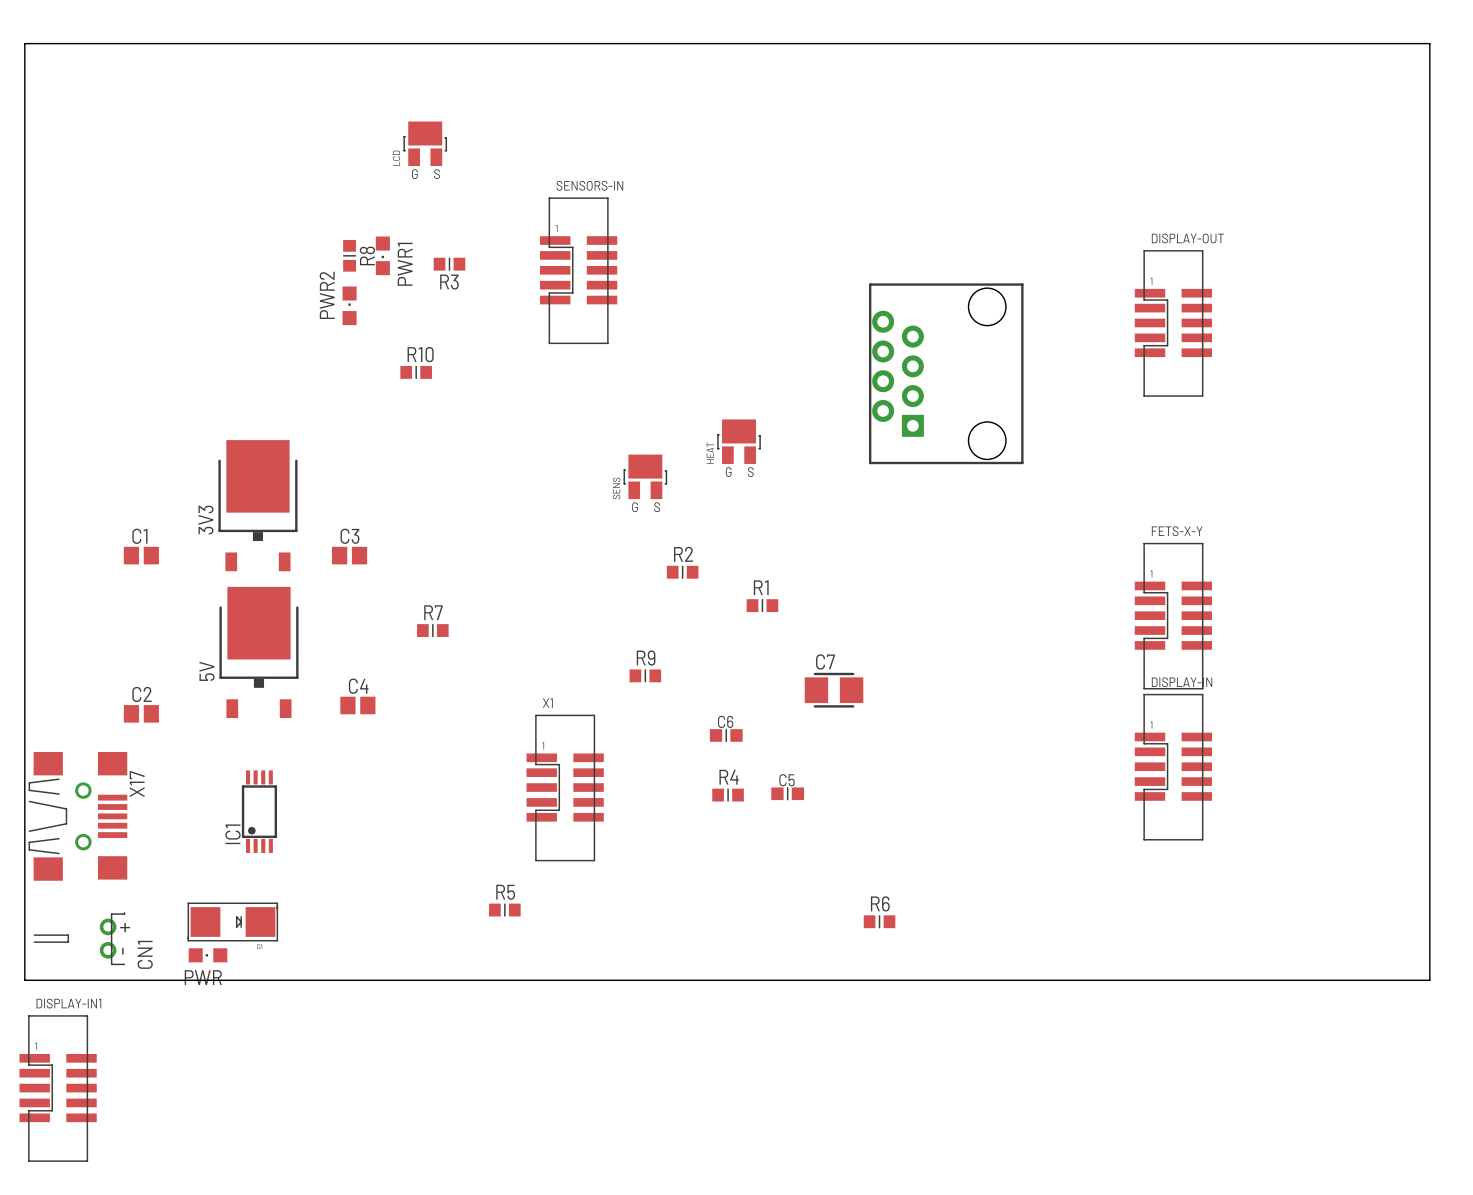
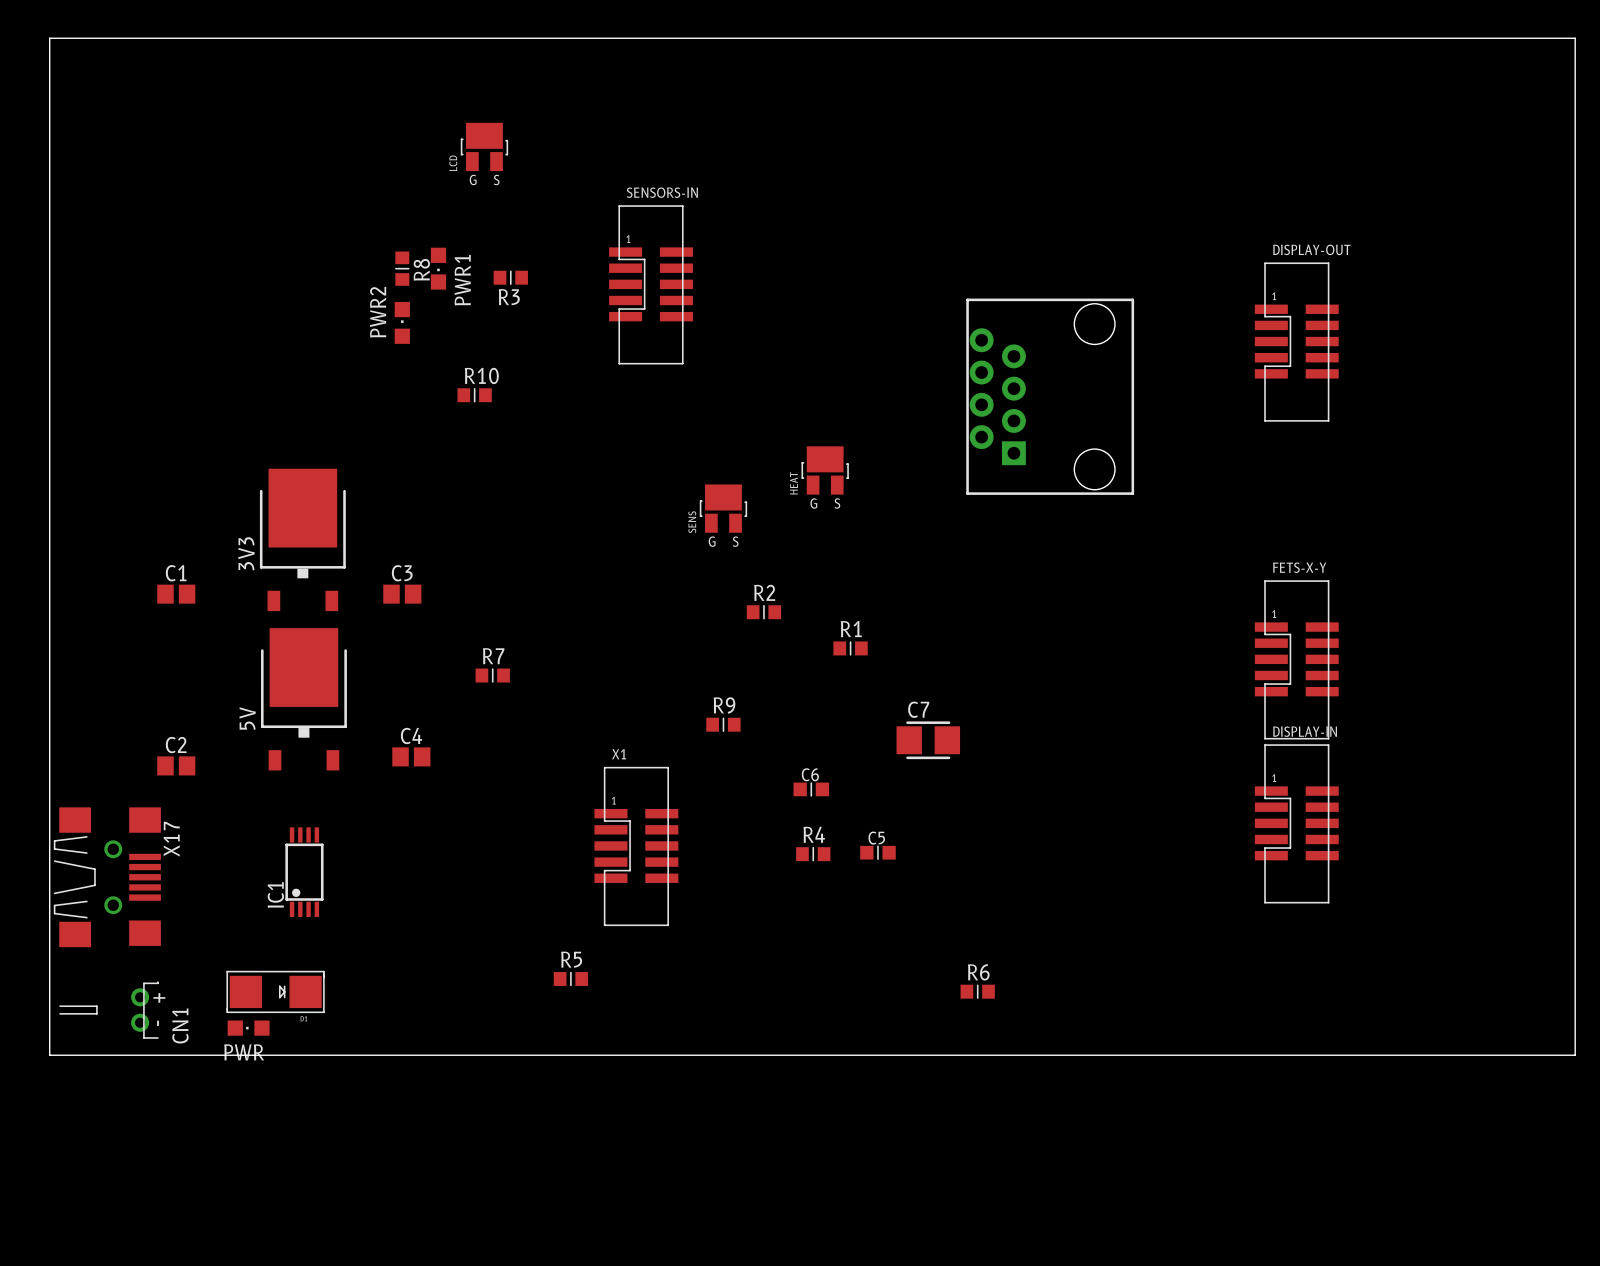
DISPLAY-IN1: (58, 1088) -> none

